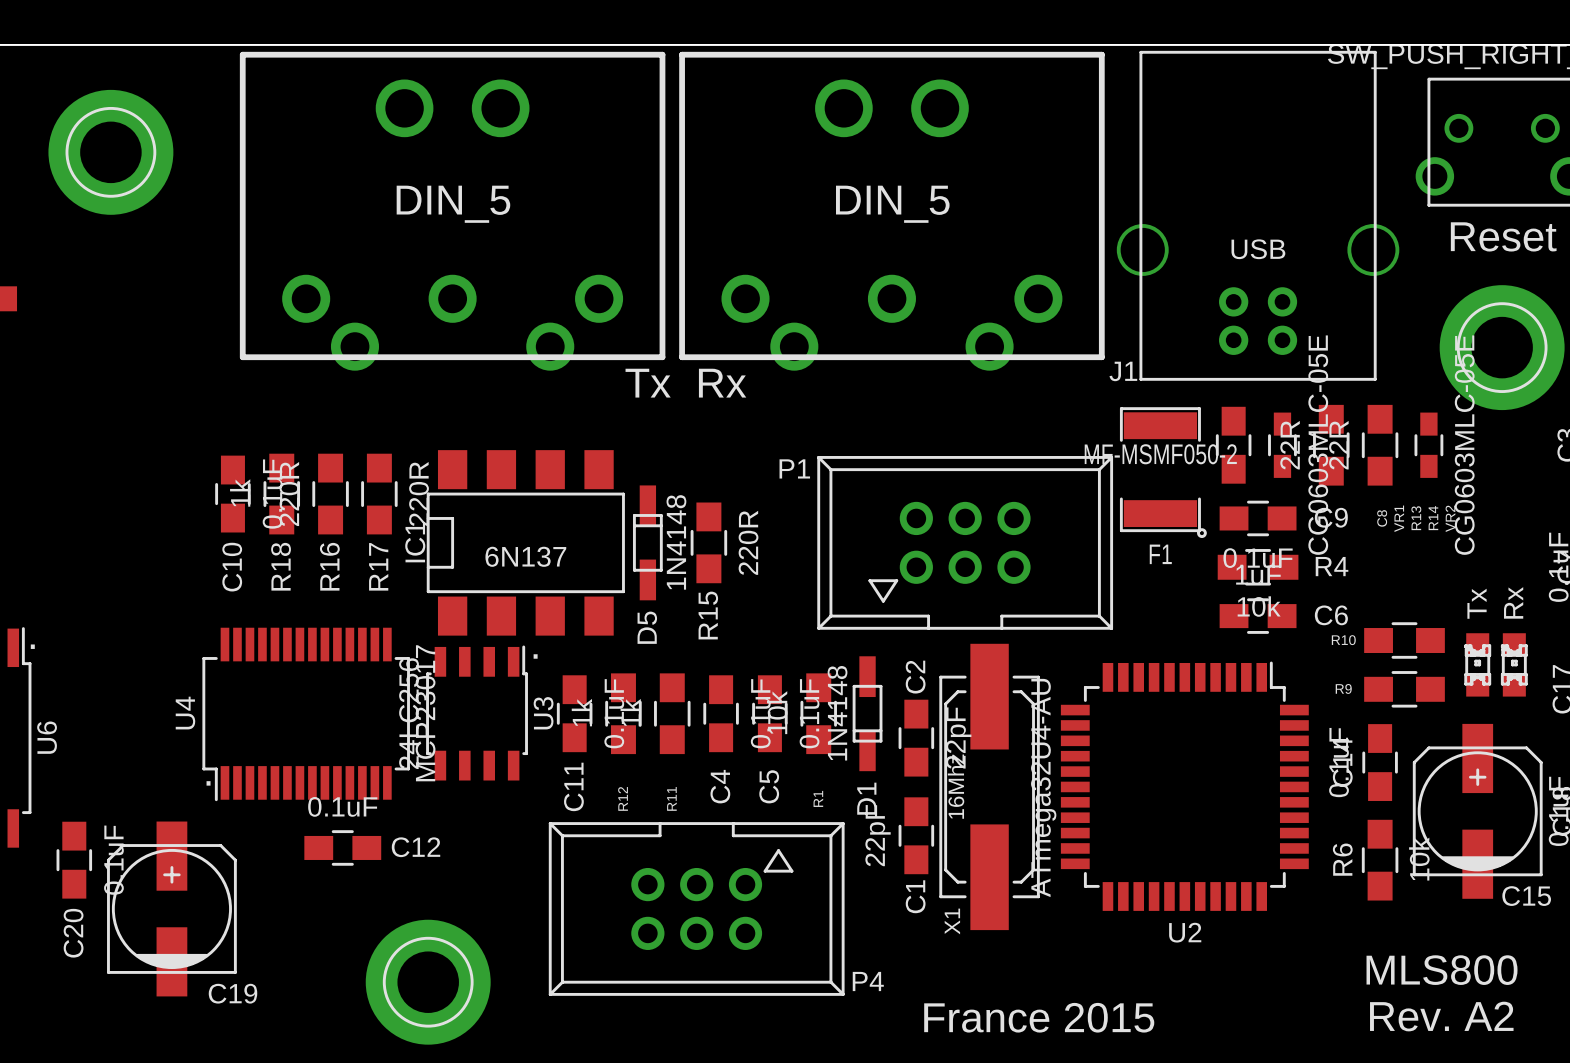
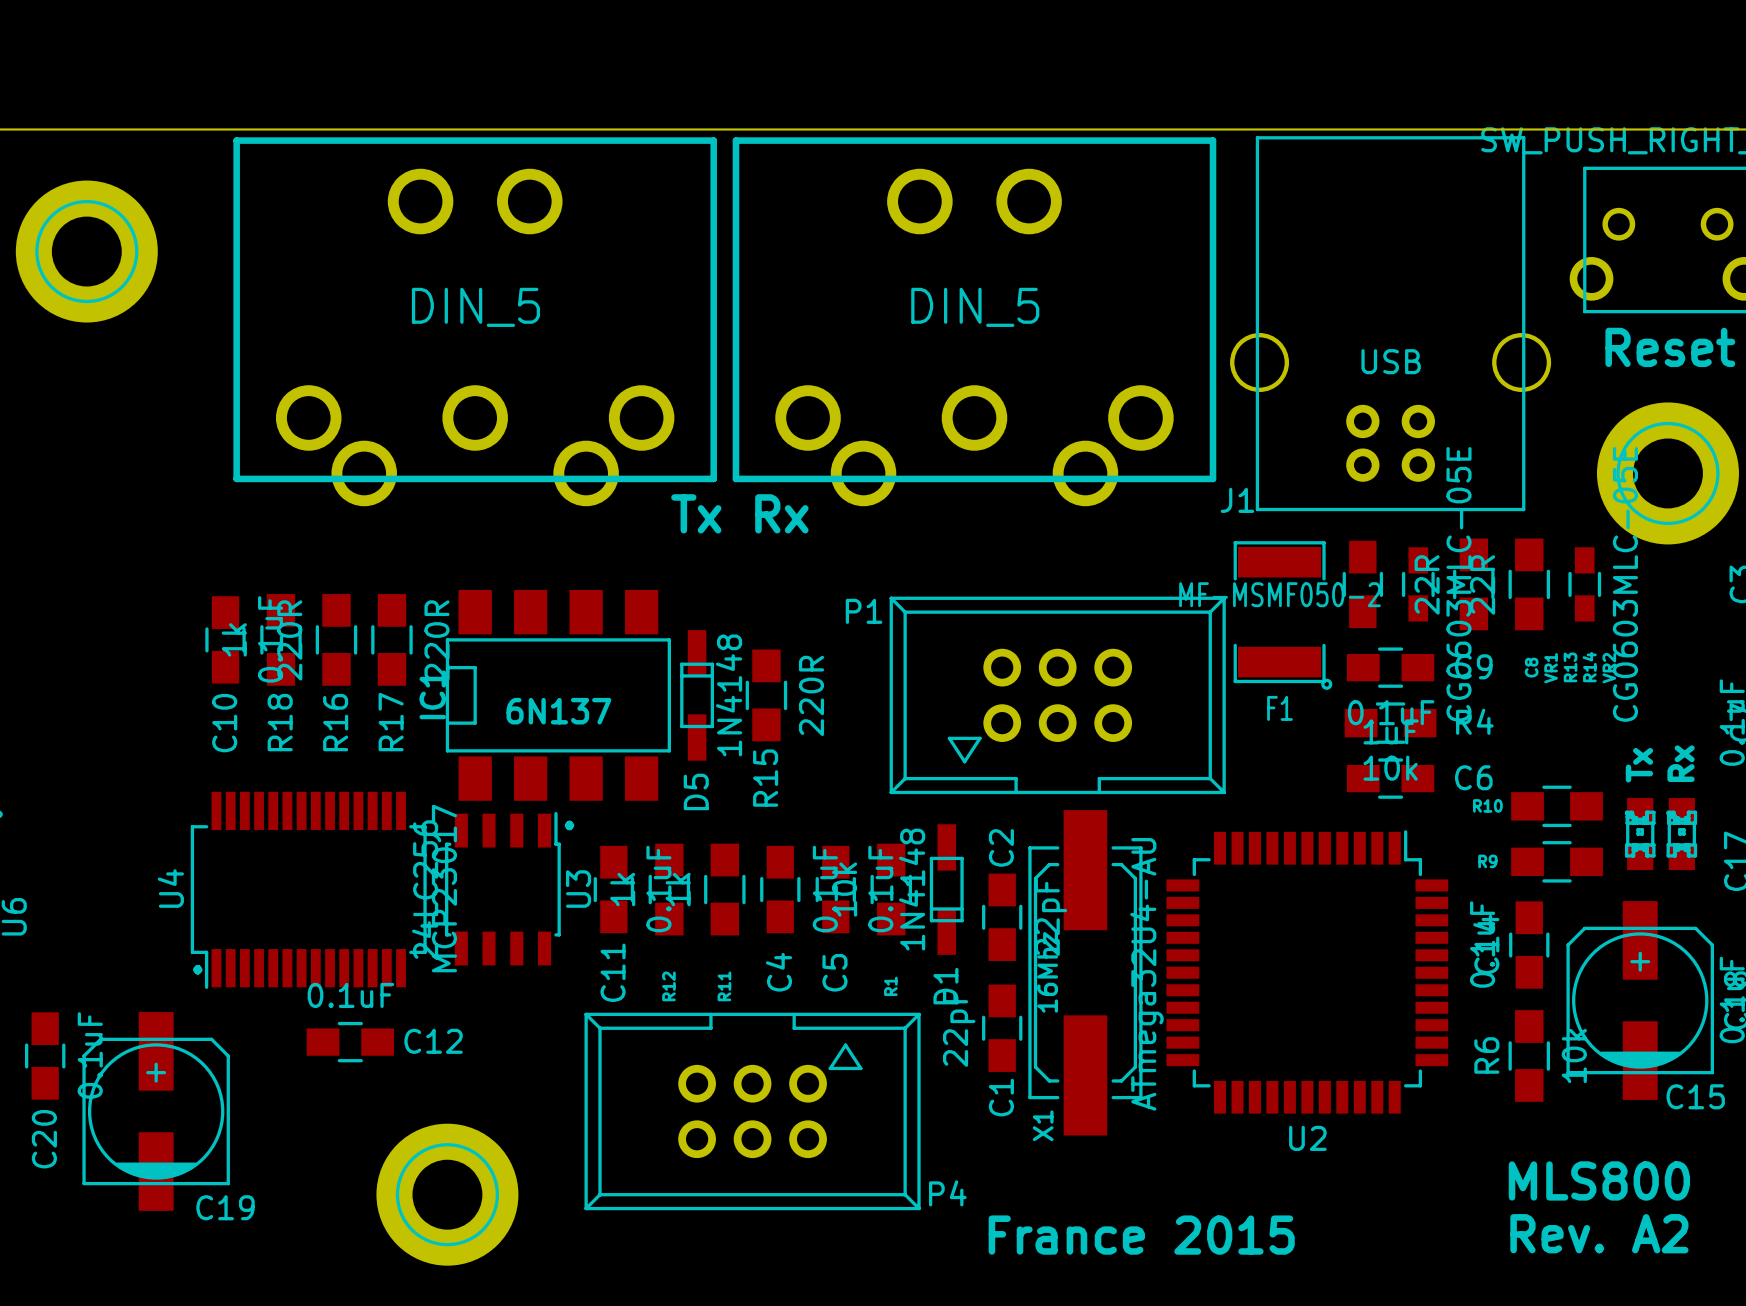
part footprint: [239, 51, 666, 371] -> [233, 137, 717, 507]
part footprint: [679, 51, 1105, 371] -> [732, 137, 1217, 507]

